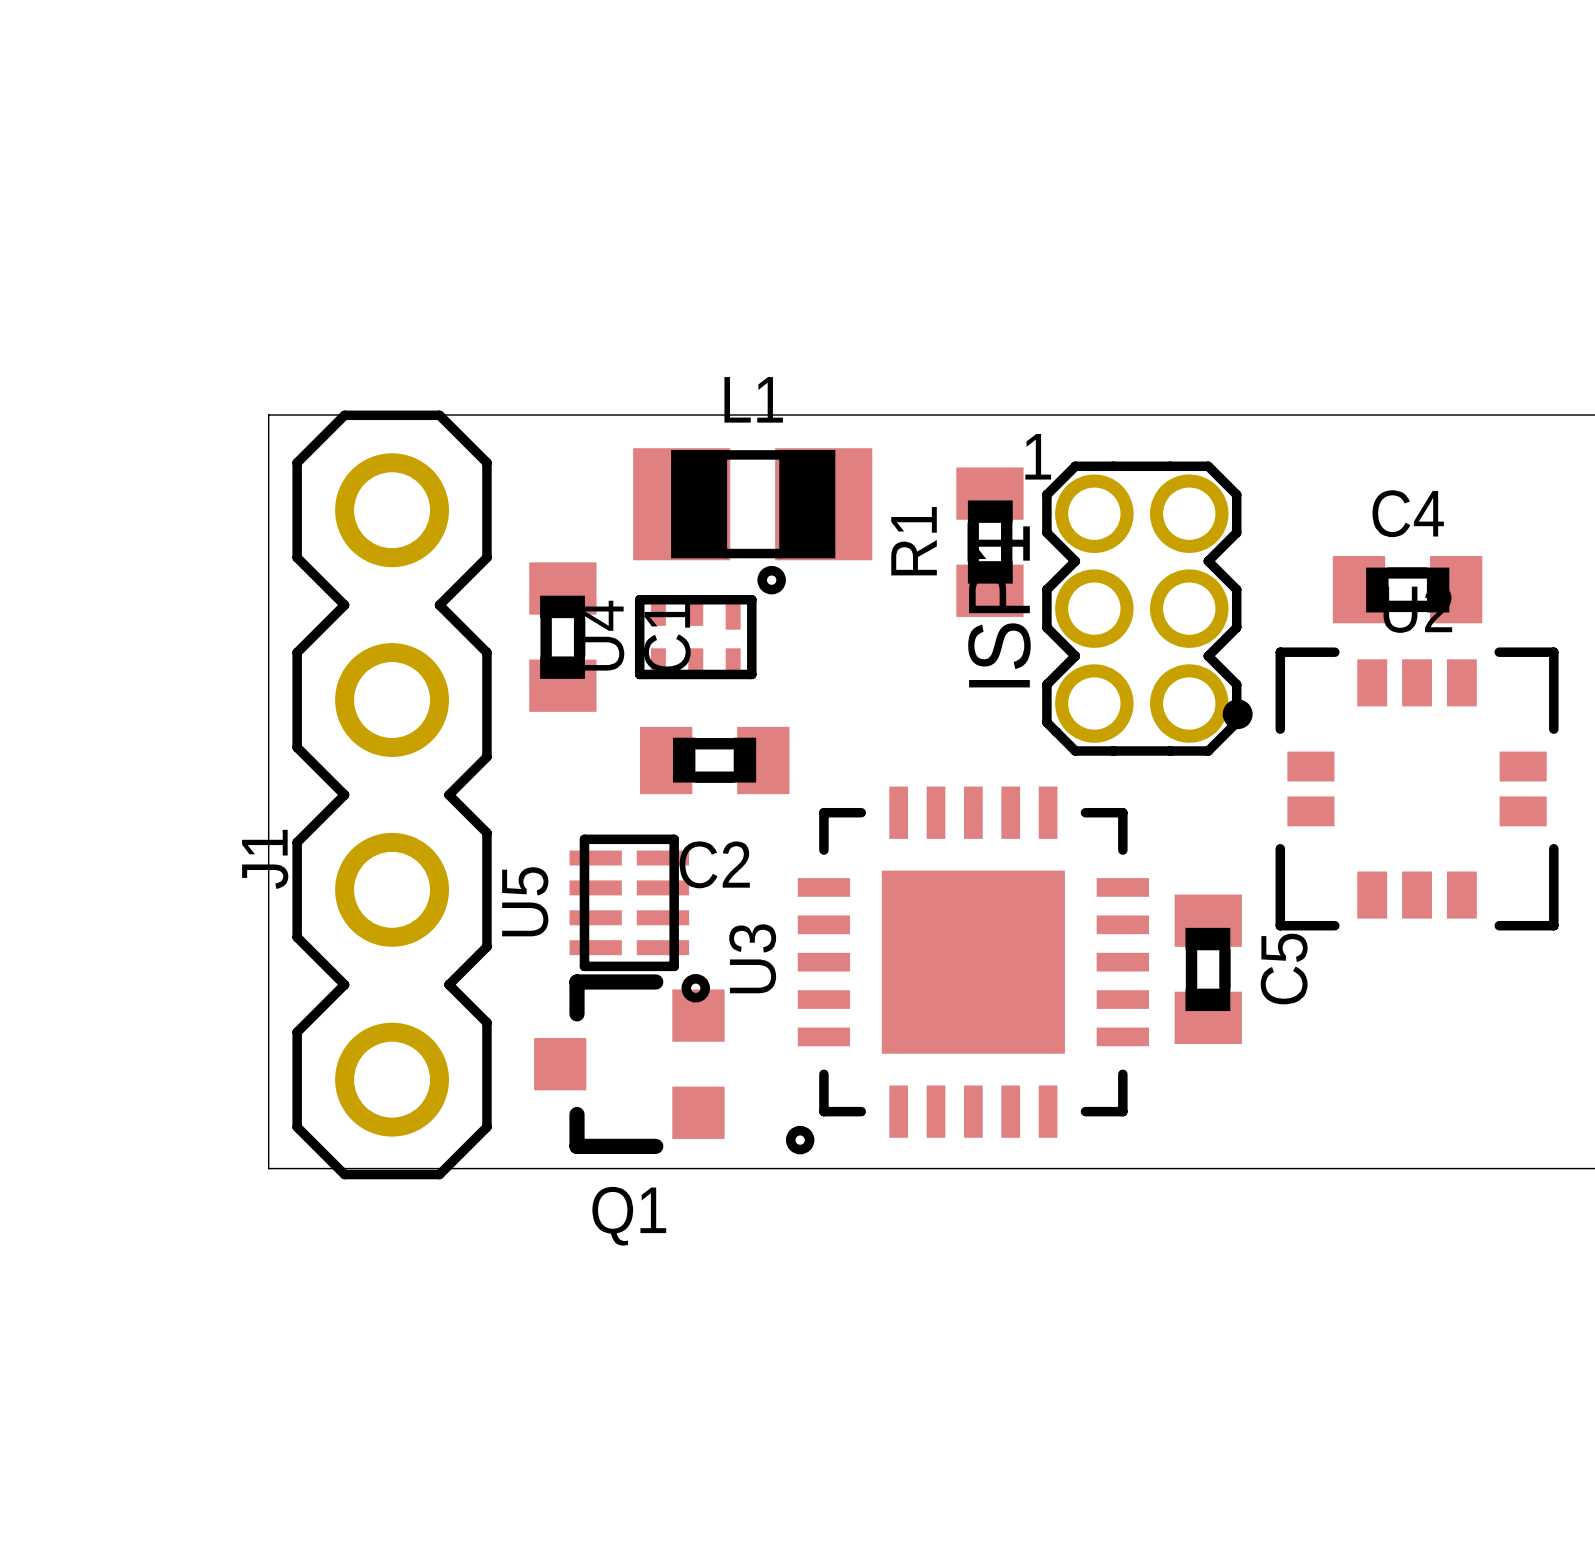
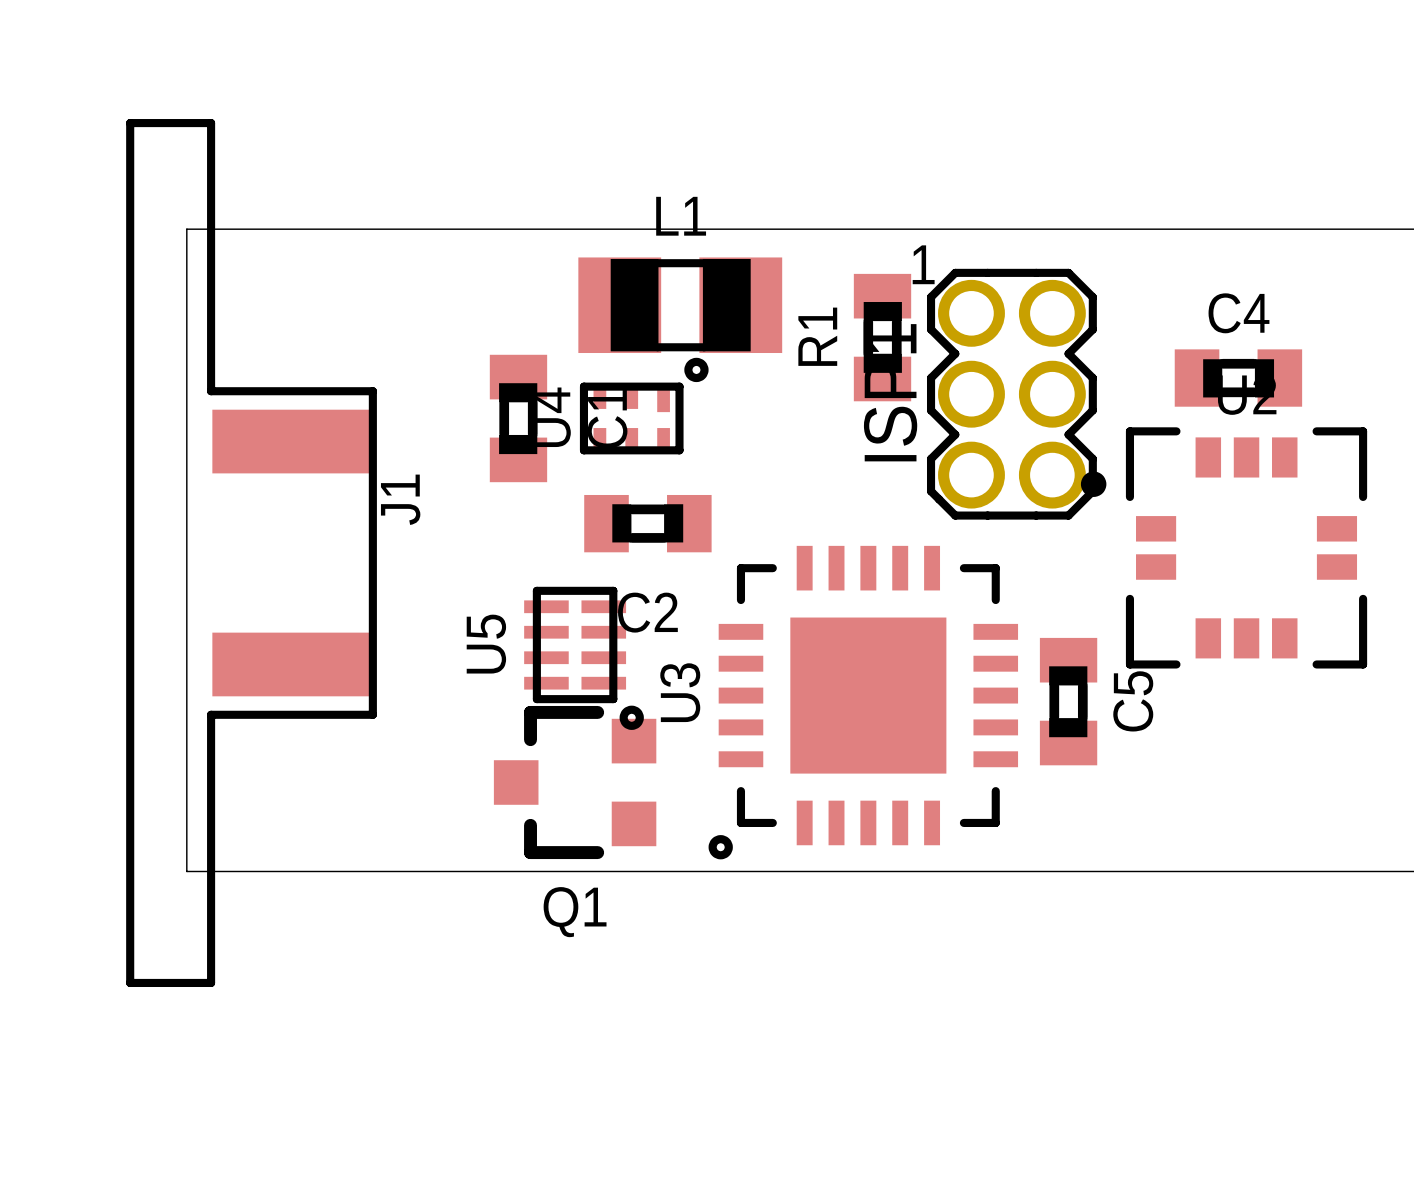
J1 footprint: [292, 410, 492, 1180] -> [126, 119, 377, 988]
board edge: (268, 415) (268, 1168) -> (267, 229) (186, 229) (186, 871) (267, 871)
J1 name position: J1 (265, 859) -> J1 (400, 499)

